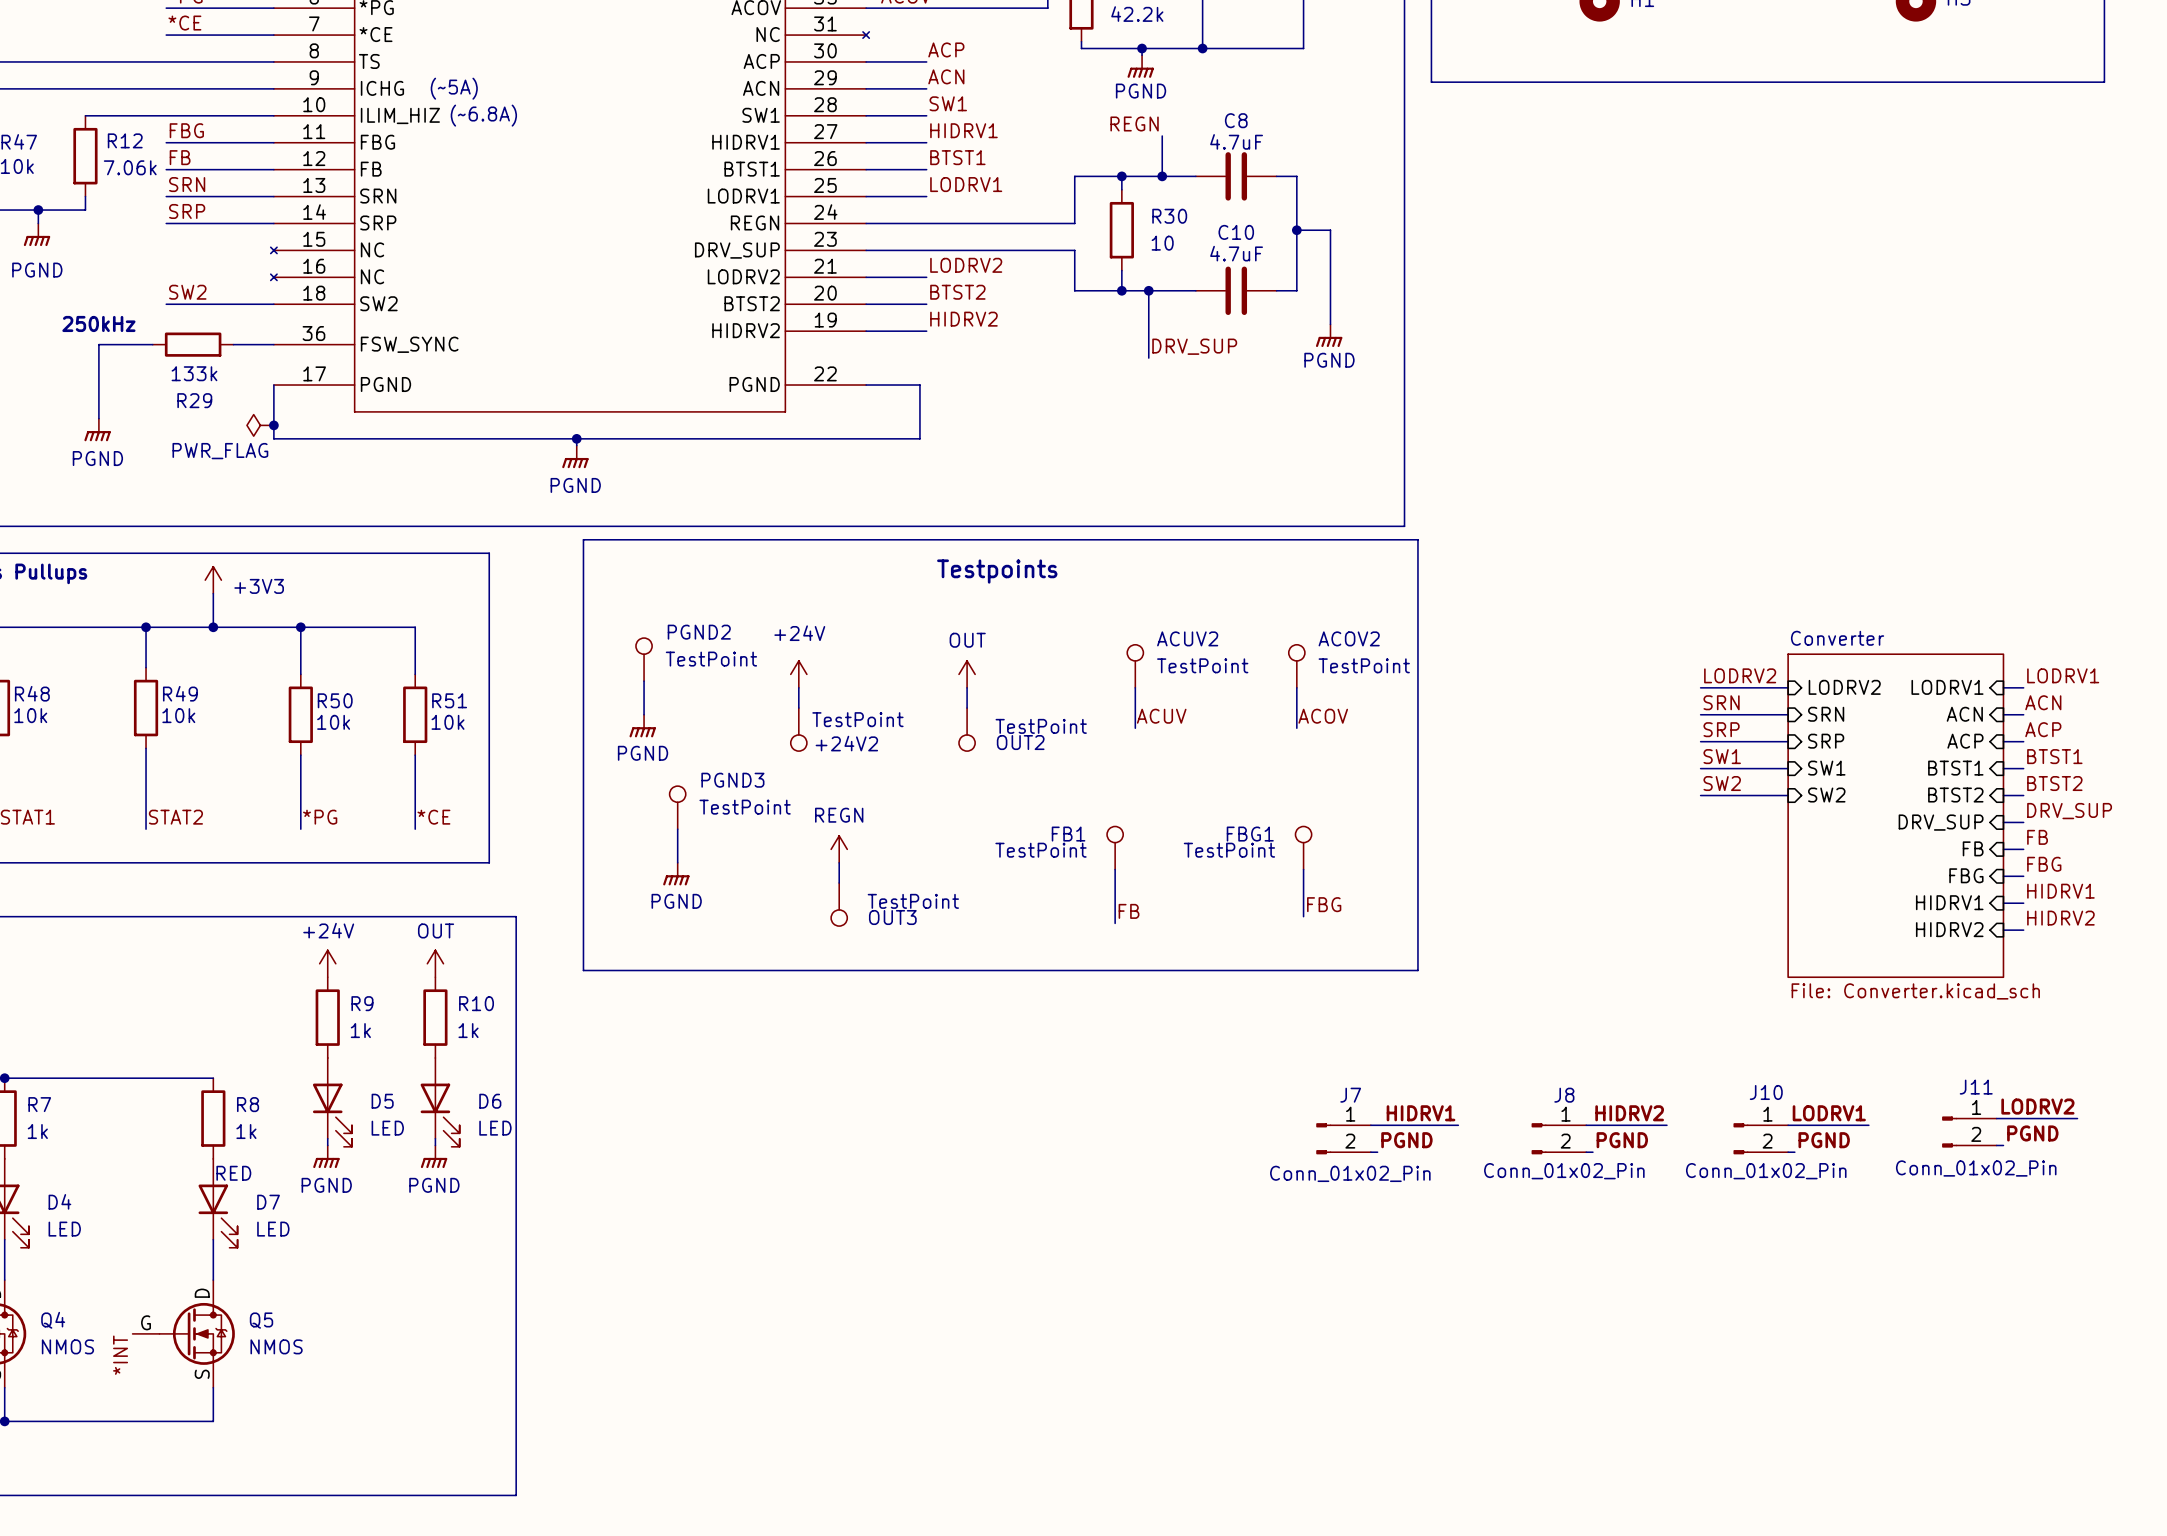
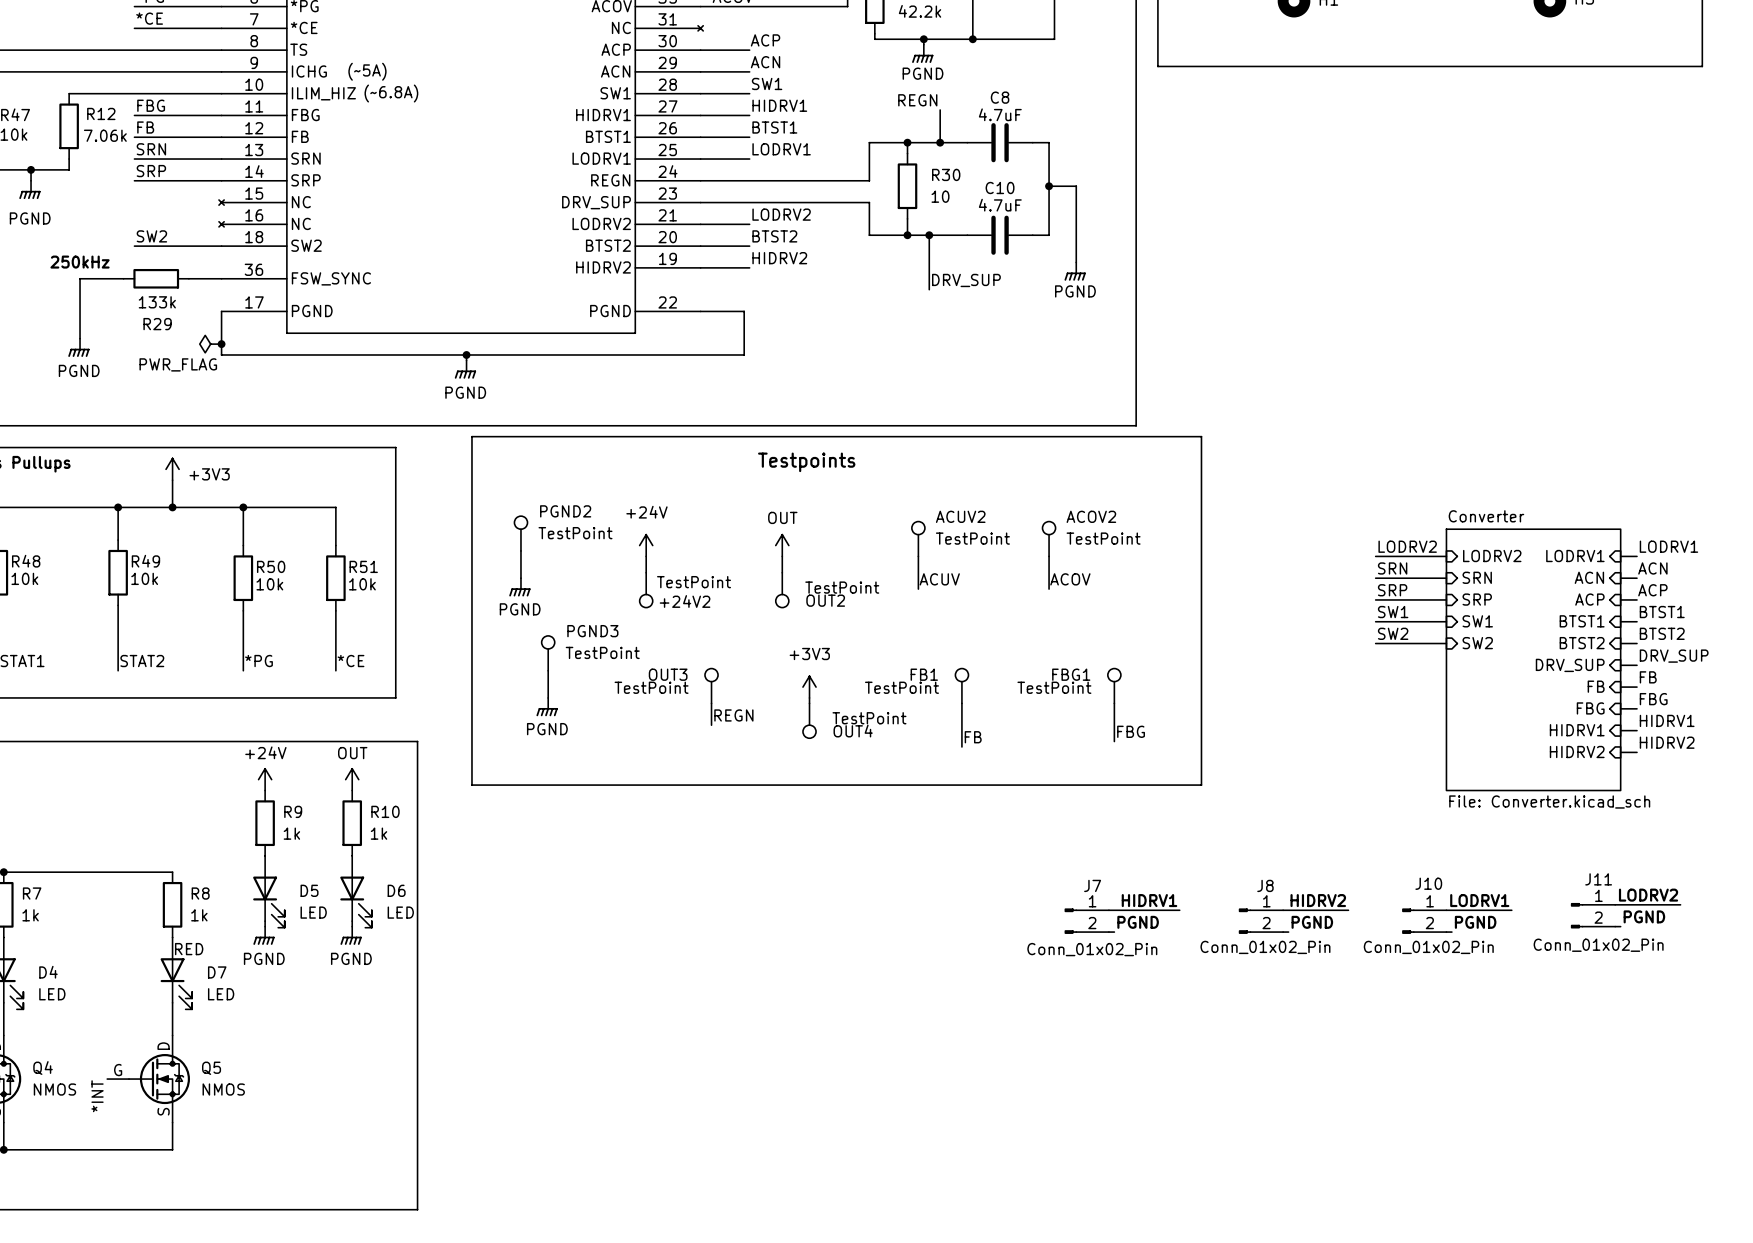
line: (1417, 539) (1417, 970) -> (1147, 436) (1201, 436) (1201, 785) (1147, 785)
FB1 position: (1115, 848) -> (961, 685)
FBG1 position: (1303, 848) -> (1114, 685)
power symbol: REGN (839, 849) -> none
power symbol: none -> +3V3 (809, 687)
wire: (839, 862) (839, 883) -> none
wire: none -> (809, 697) (809, 703)
wire: none -> (711, 703) (711, 725)
wire: (1115, 869) (1115, 923) -> (961, 703) (961, 746)
wire: (1303, 869) (1303, 916) -> (1114, 703) (1114, 741)
label: none -> REGN (733, 715)
OUT4: none -> TestPoint (809, 720)
OUT3 position: (839, 904) -> (711, 685)
label position: FBG (1324, 904) -> FBG (1131, 731)
label position: FB (1129, 911) -> FB (973, 737)
OUT3 rotation: 0° (839, 918) -> 180° (711, 675)

